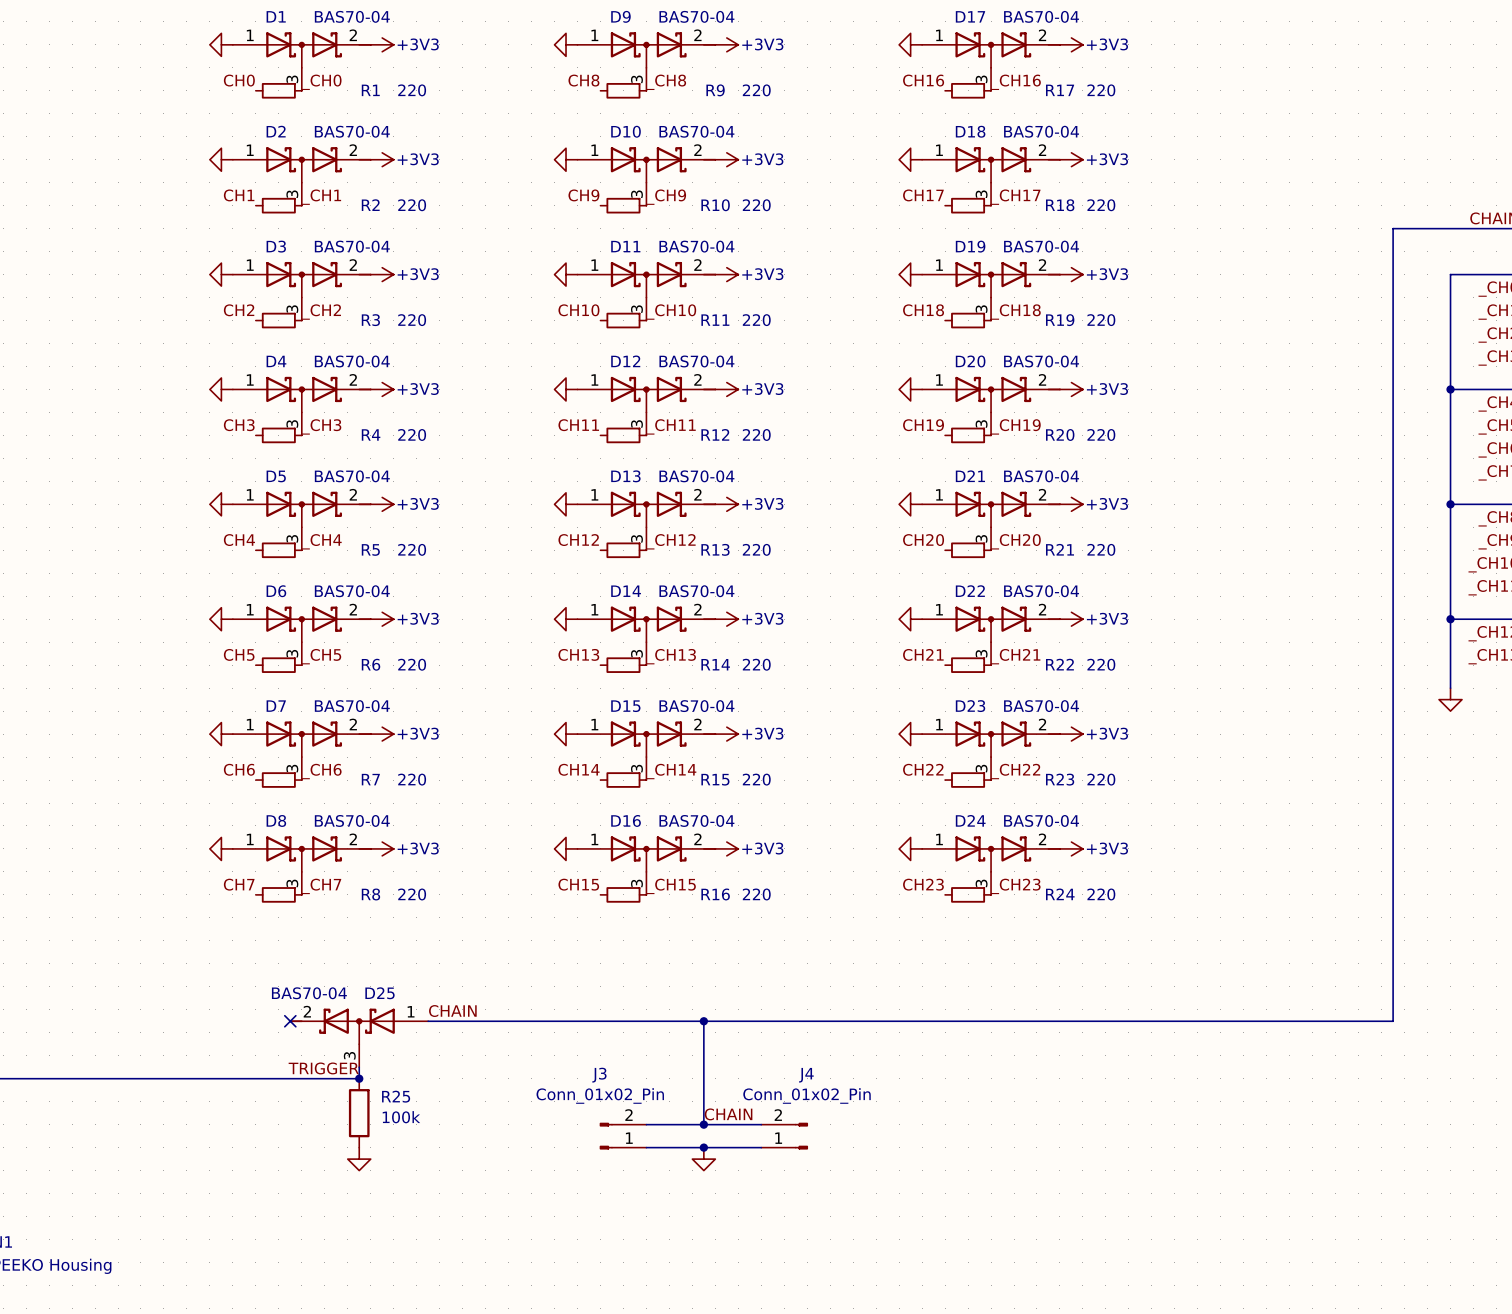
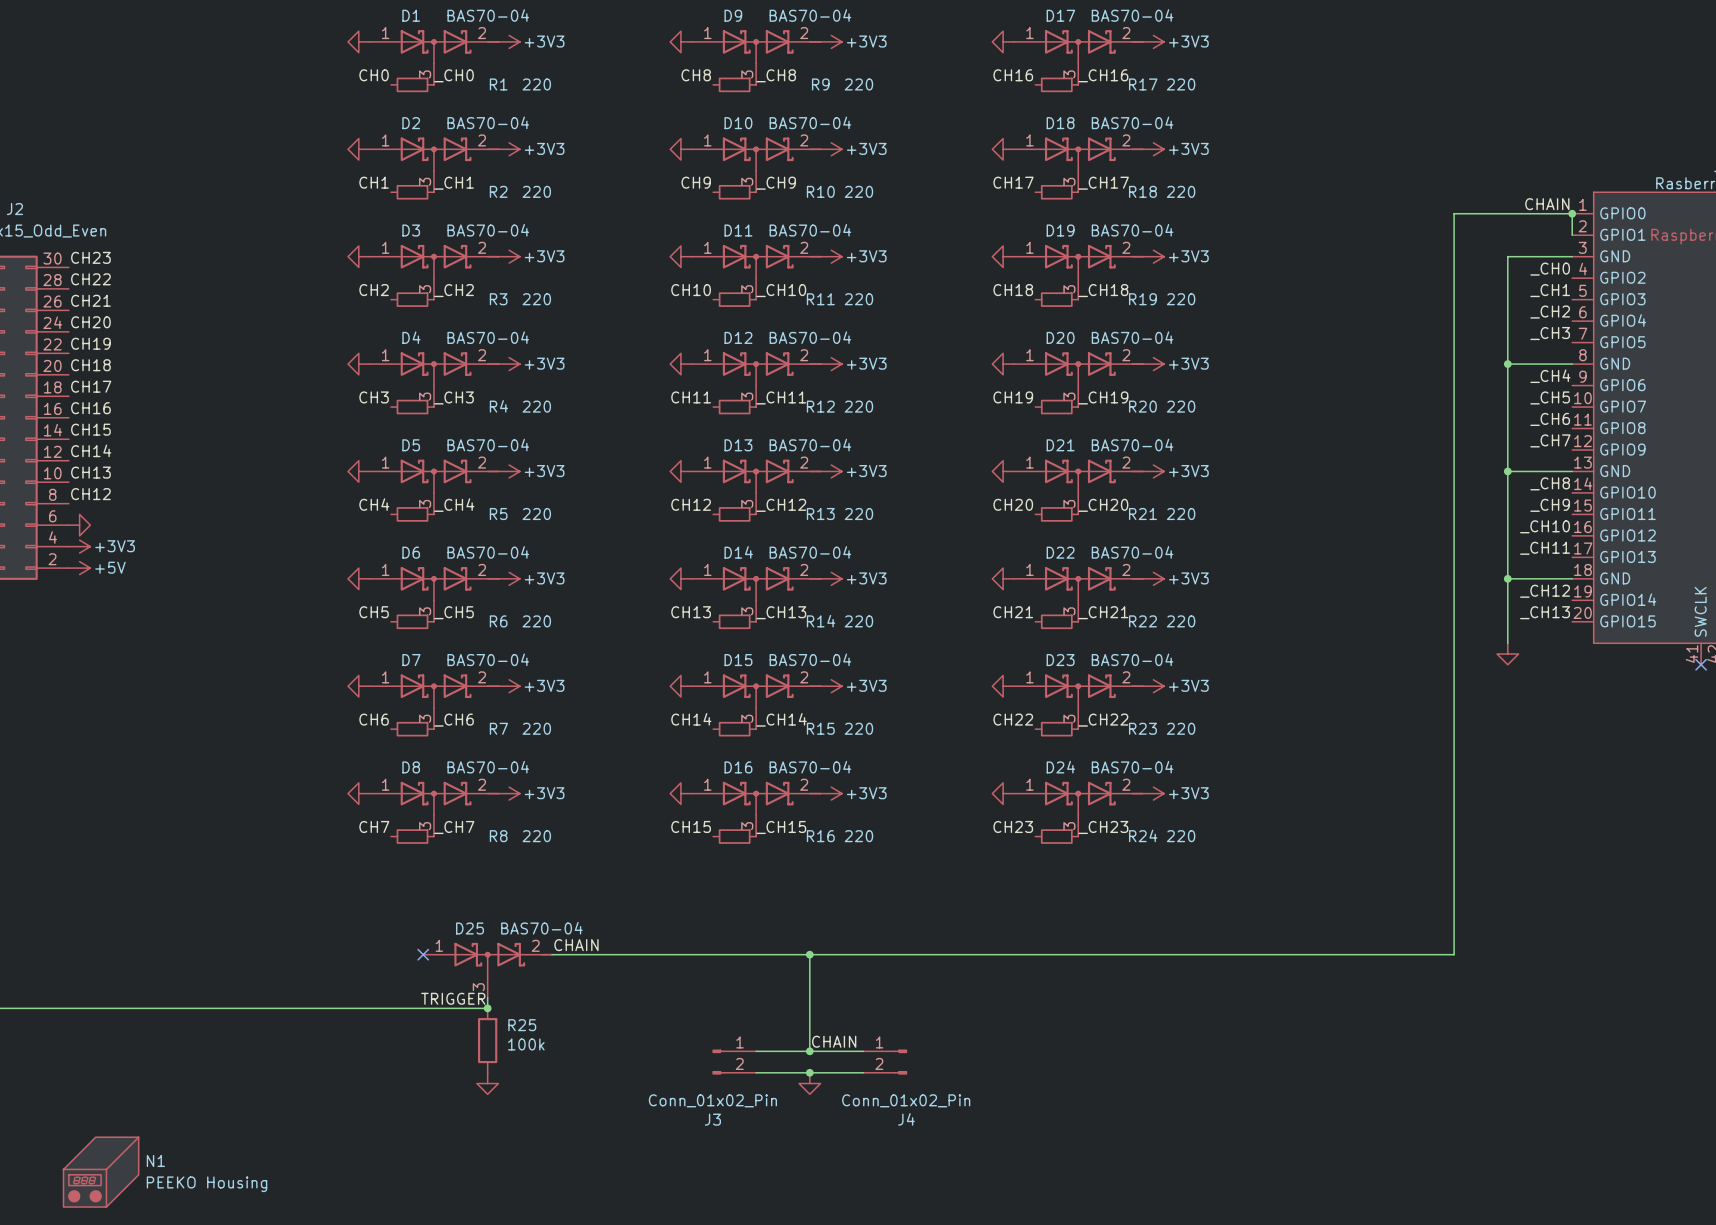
D25 flip: as is (342, 1026) -> left-right (503, 959)
J3 flip: as is (606, 1136) -> up-down (718, 1062)
J4 flip: as is (801, 1136) -> up-down (901, 1062)

